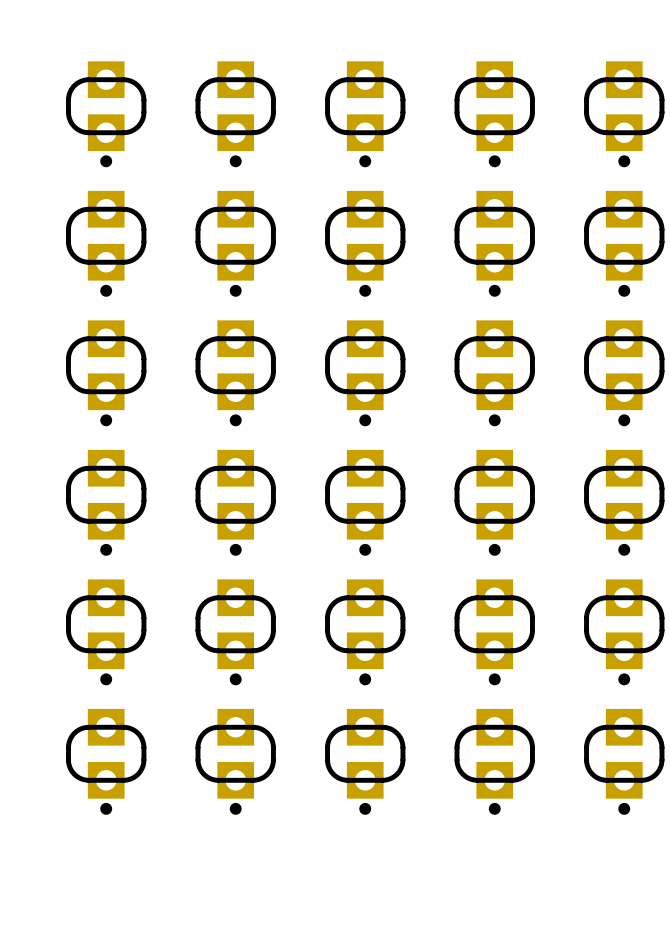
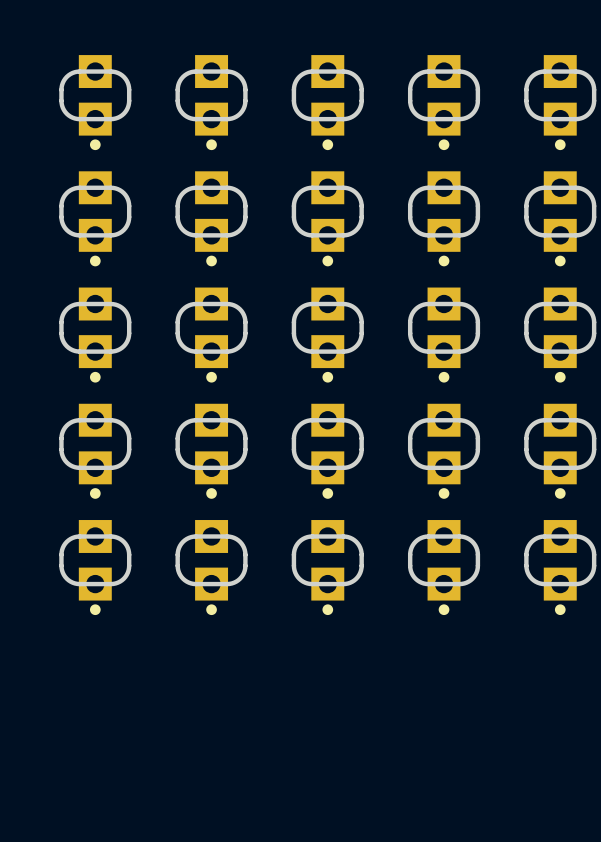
part: (106, 761) -> none
part: (235, 761) -> none
part: (365, 761) -> none
part: (494, 761) -> none
part: (624, 761) -> none

